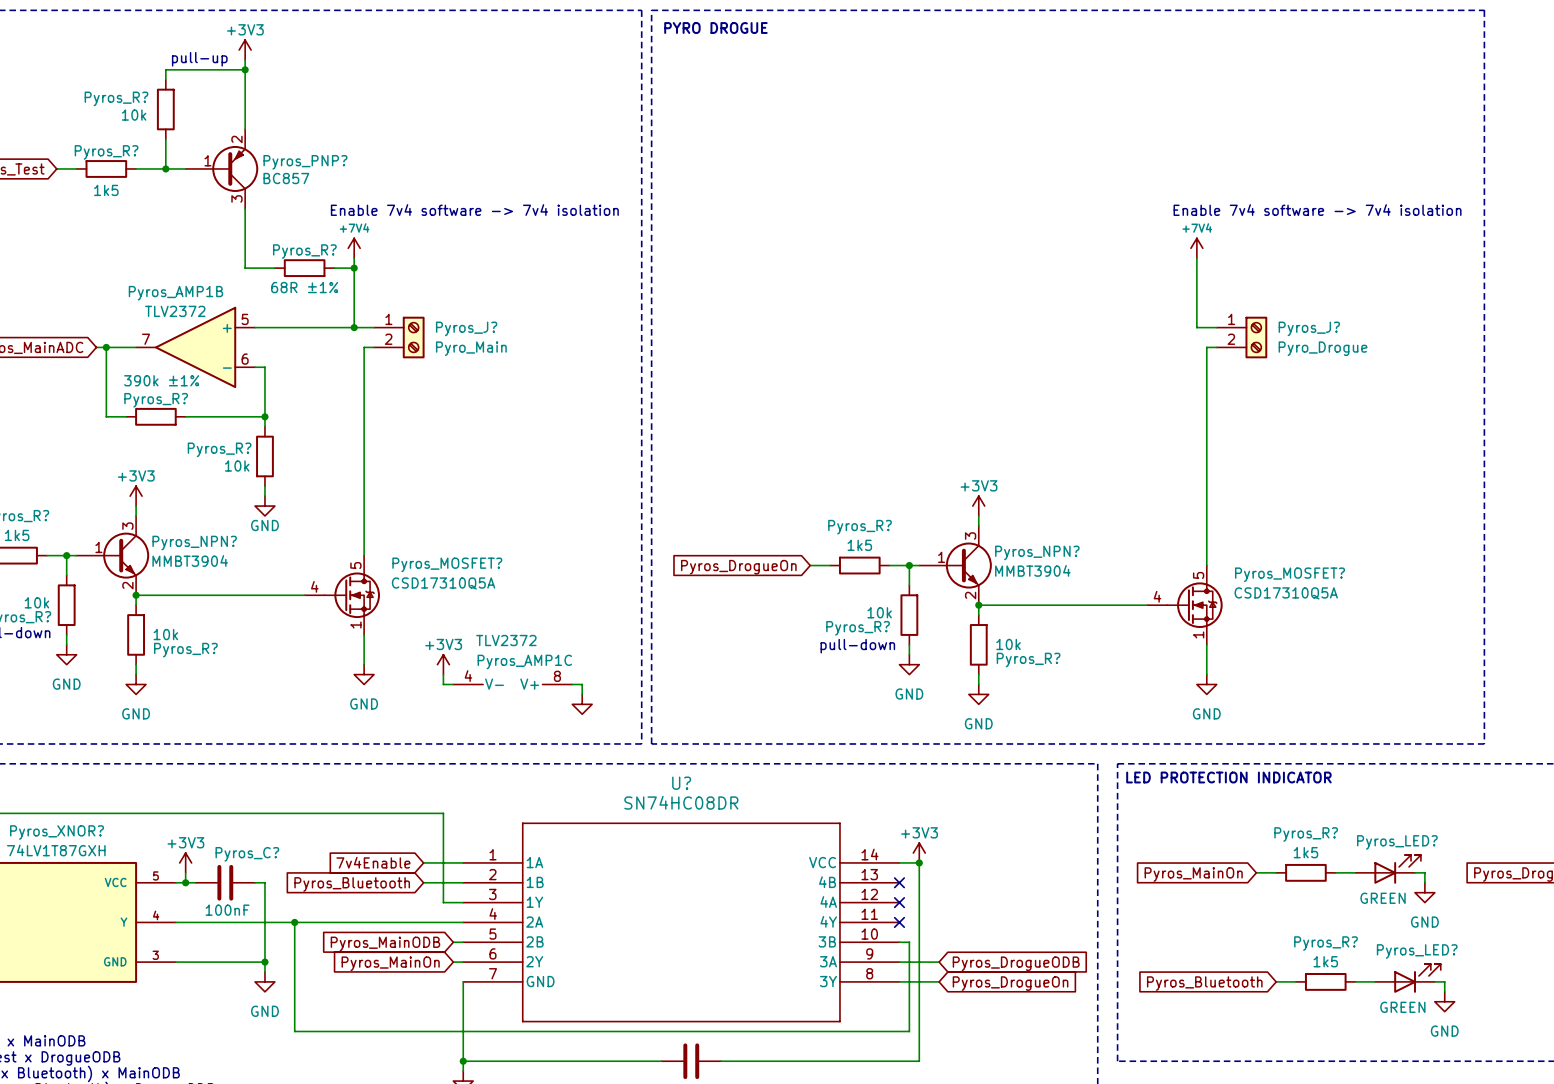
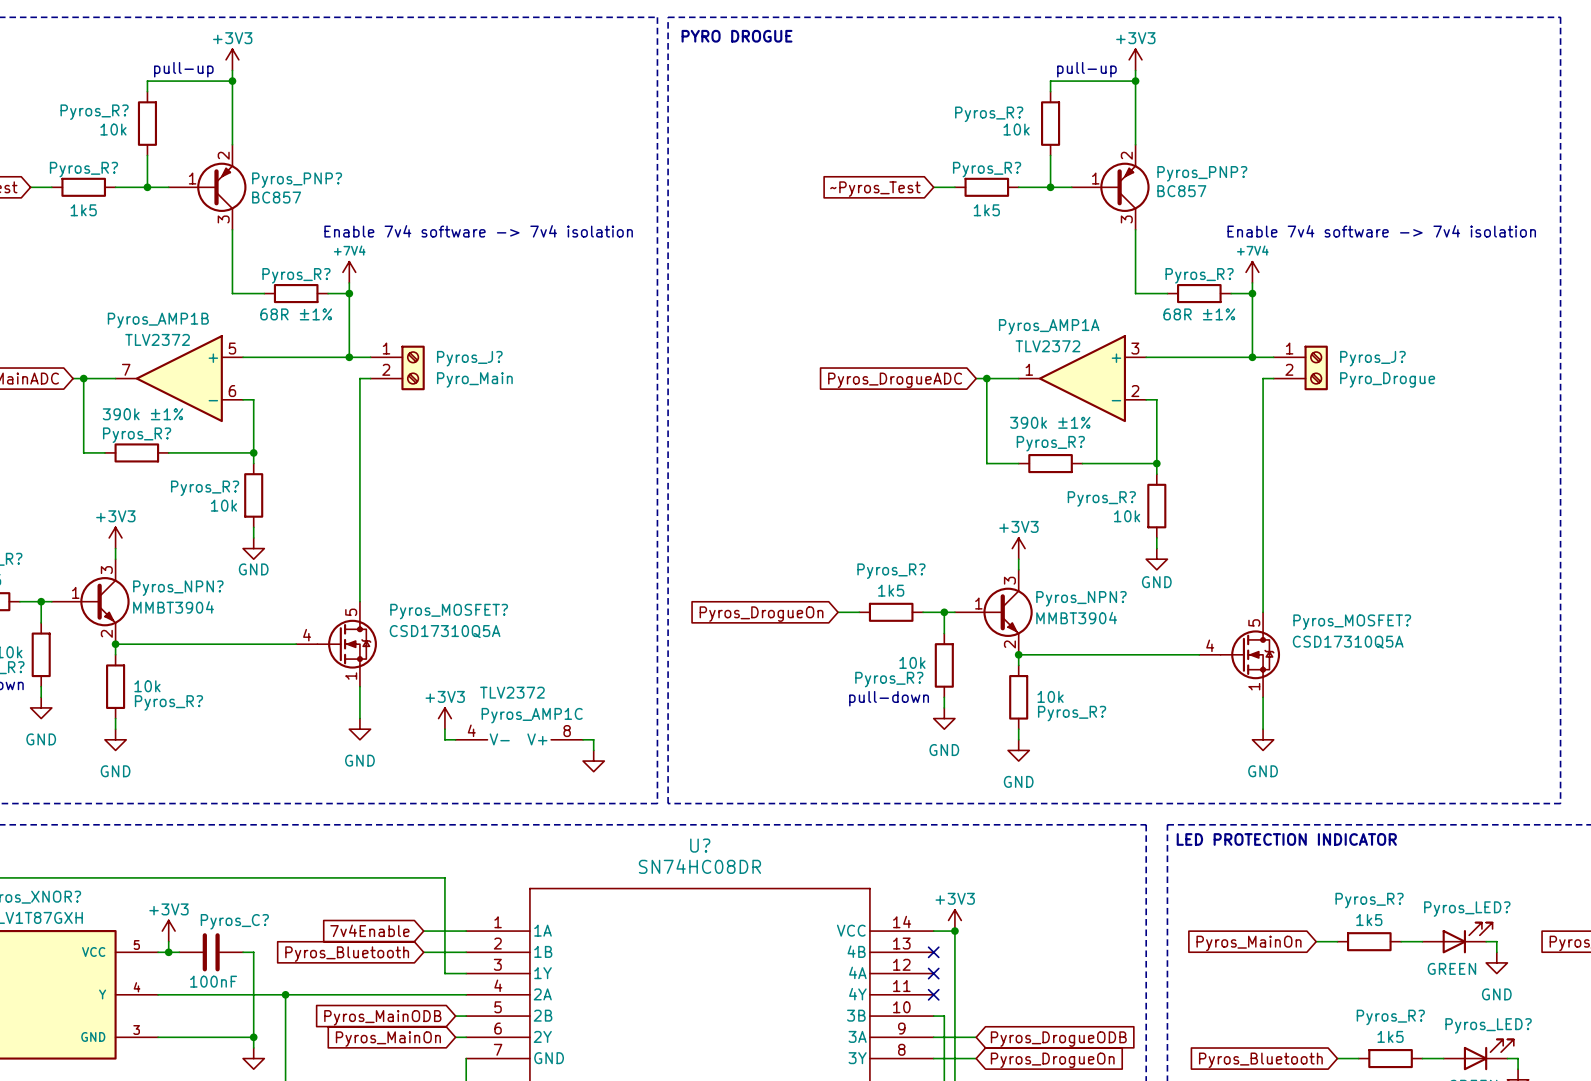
power symbol: none -> +3V3 (1135, 59)
text: none -> pull-up (1086, 69)
wire: none -> (1135, 70) (1135, 144)
wire: none -> (1135, 81) (1050, 81) (1050, 91)
junction: none -> (1135, 81)
Pyros_R?: none -> 10k (1050, 123)
wire: none -> (1050, 155) (1050, 187)
wire: none -> (933, 187) (954, 187)
Pyros_R?: none -> 1k5 (986, 187)
wire: none -> (1018, 187) (1071, 187)
junction: none -> (1050, 187)
Pyros_PNP?: none -> BC857 (1110, 187)
global label: none -> ~Pyros_Test (875, 189)
wire: none -> (1135, 229) (1135, 293) (1167, 293)
Pyros_R?: none -> 68R ±1% (1199, 293)
wire: none -> (1231, 293) (1252, 293)
junction: none -> (1252, 293)
wire: none -> (1146, 357) (1252, 357)
junction: none -> (1252, 357)
wire: none -> (976, 378) (1018, 378)
wire: none -> (986, 378) (986, 463) (1018, 463)
junction: none -> (986, 378)
Pyros_AMP1A: none -> TLV2372 (1082, 378)
global label: none -> Pyros_DrogueADC (895, 380)
wire: none -> (1146, 399) (1156, 399) (1156, 474)
Pyros_R?: none -> 390k ±1% (1050, 463)
wire: none -> (1082, 463) (1156, 463)
junction: none -> (1156, 463)
Pyros_R?: none -> 10k (1156, 506)
wire: none -> (1156, 537) (1156, 548)
power symbol: none -> GND (1156, 559)

